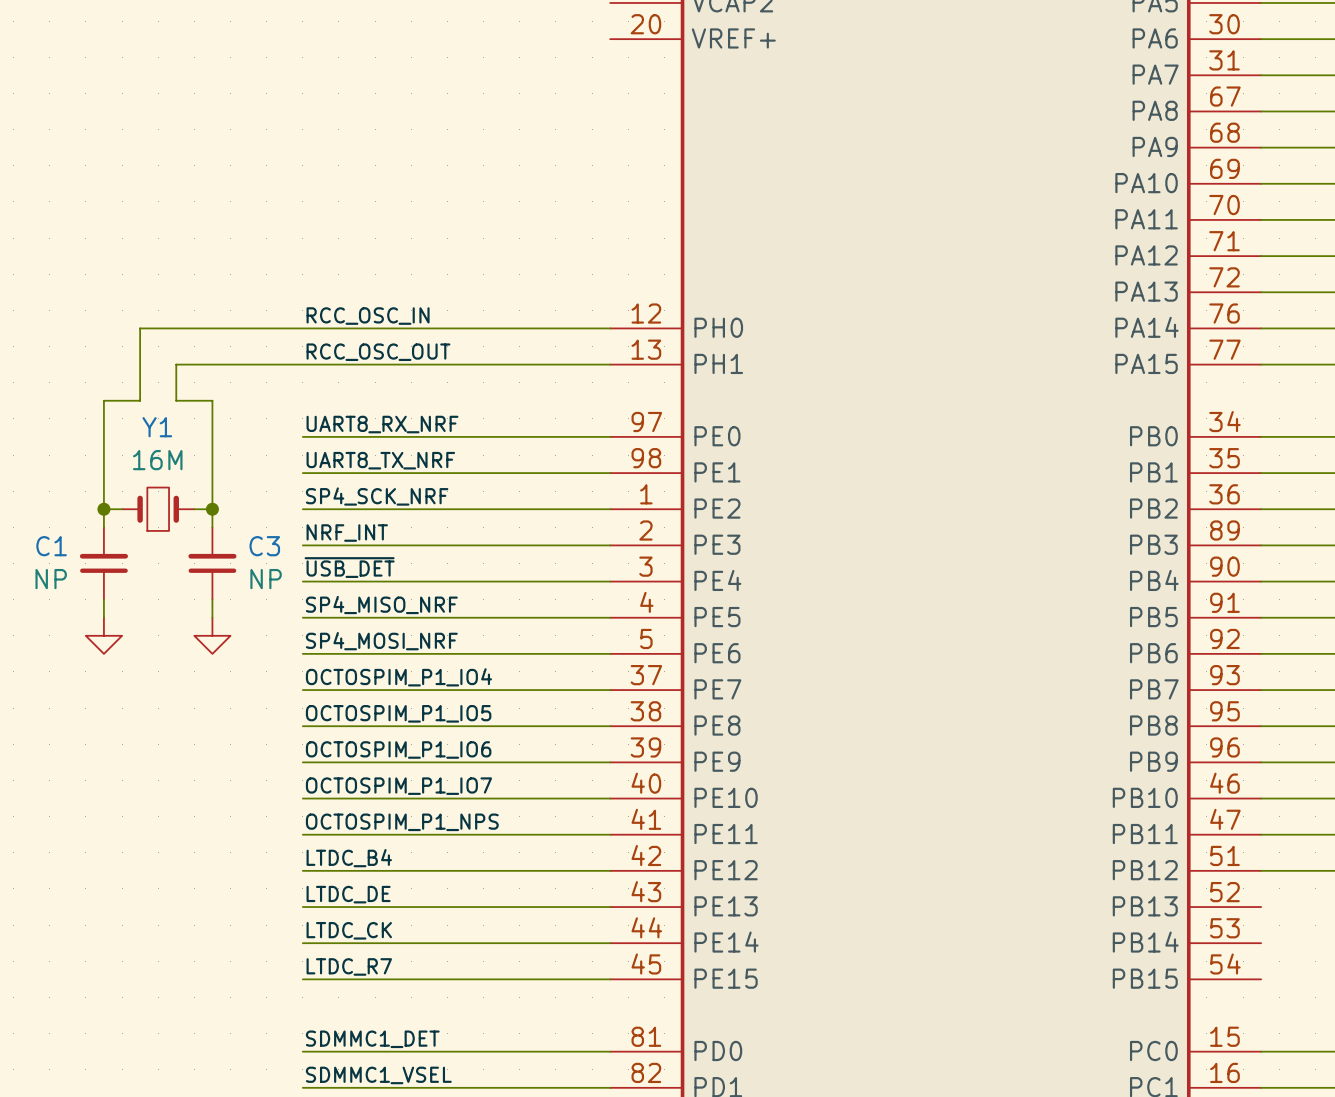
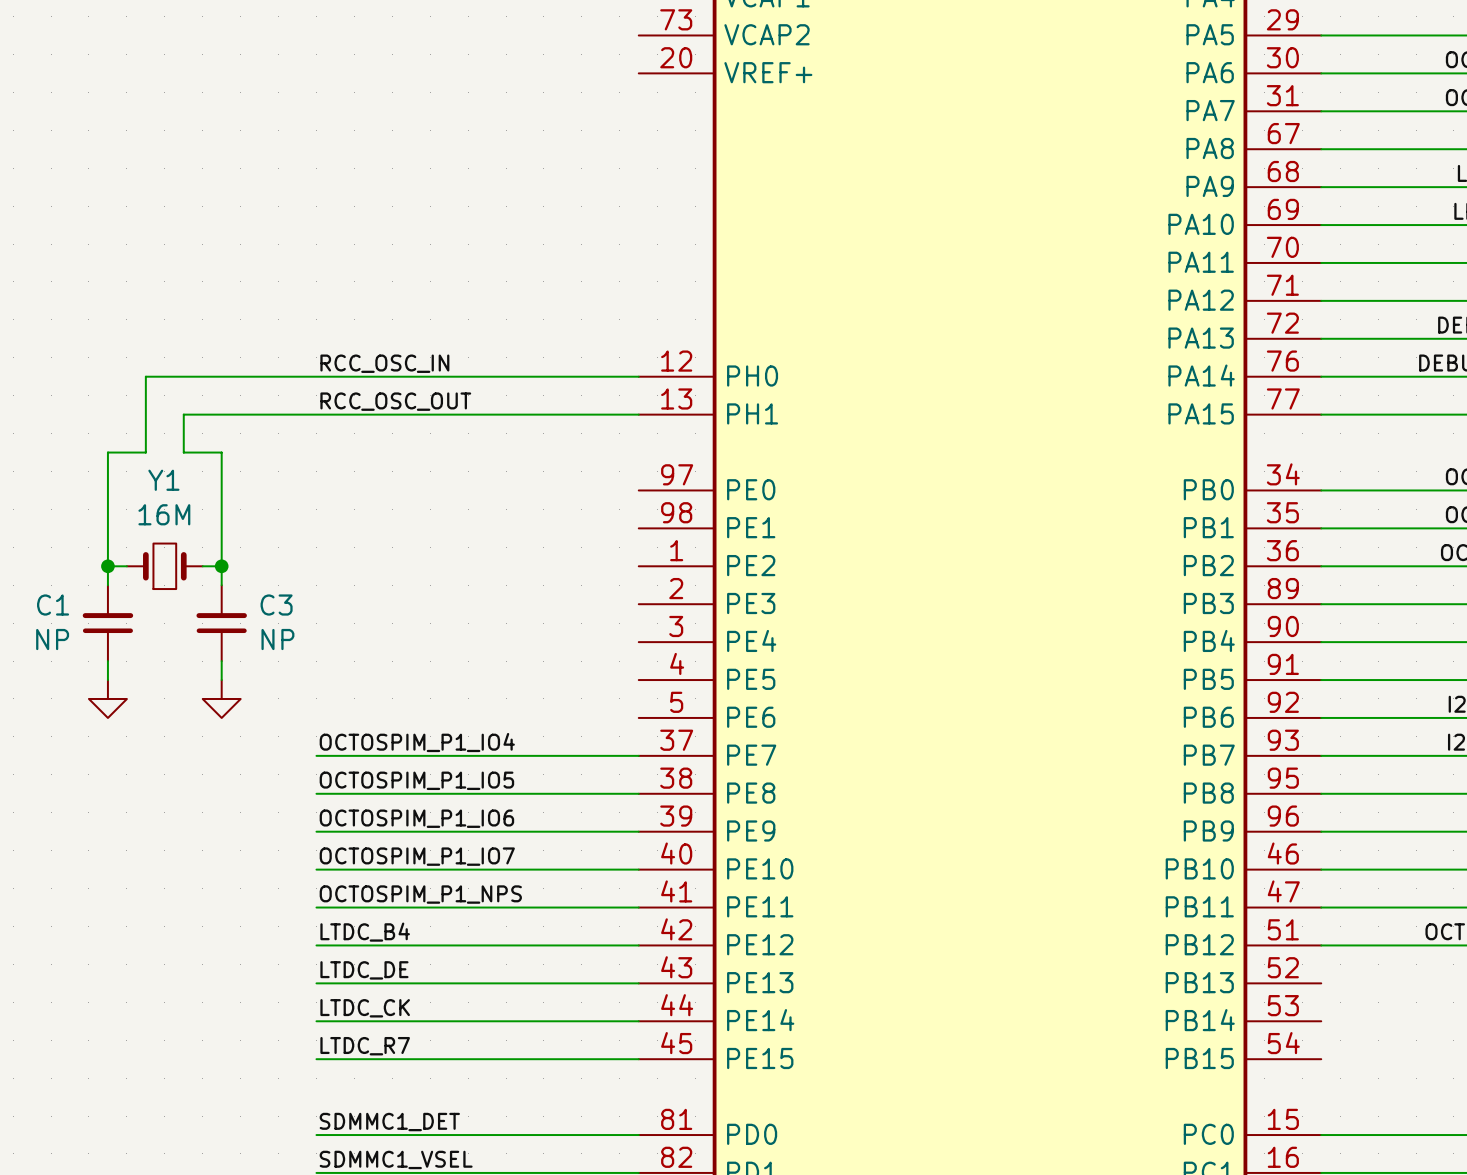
label: UART8_RX_NRF (382, 424) -> none
wire: (302, 436) (610, 436) -> none
label: UART8_TX_NRF (380, 460) -> none
wire: (302, 473) (610, 473) -> none
label: SP4_SCK_NRF (377, 496) -> none
wire: (302, 509) (610, 509) -> none
label: NRF_INT (347, 533) -> none
wire: (302, 545) (610, 545) -> none
label: ~{USB_DET} (349, 567) -> none
wire: (302, 581) (610, 581) -> none
label: SP4_MISO_NRF (381, 605) -> none
wire: (302, 617) (610, 617) -> none
label: SP4_MOSI_NRF (381, 641) -> none
wire: (302, 653) (610, 653) -> none

